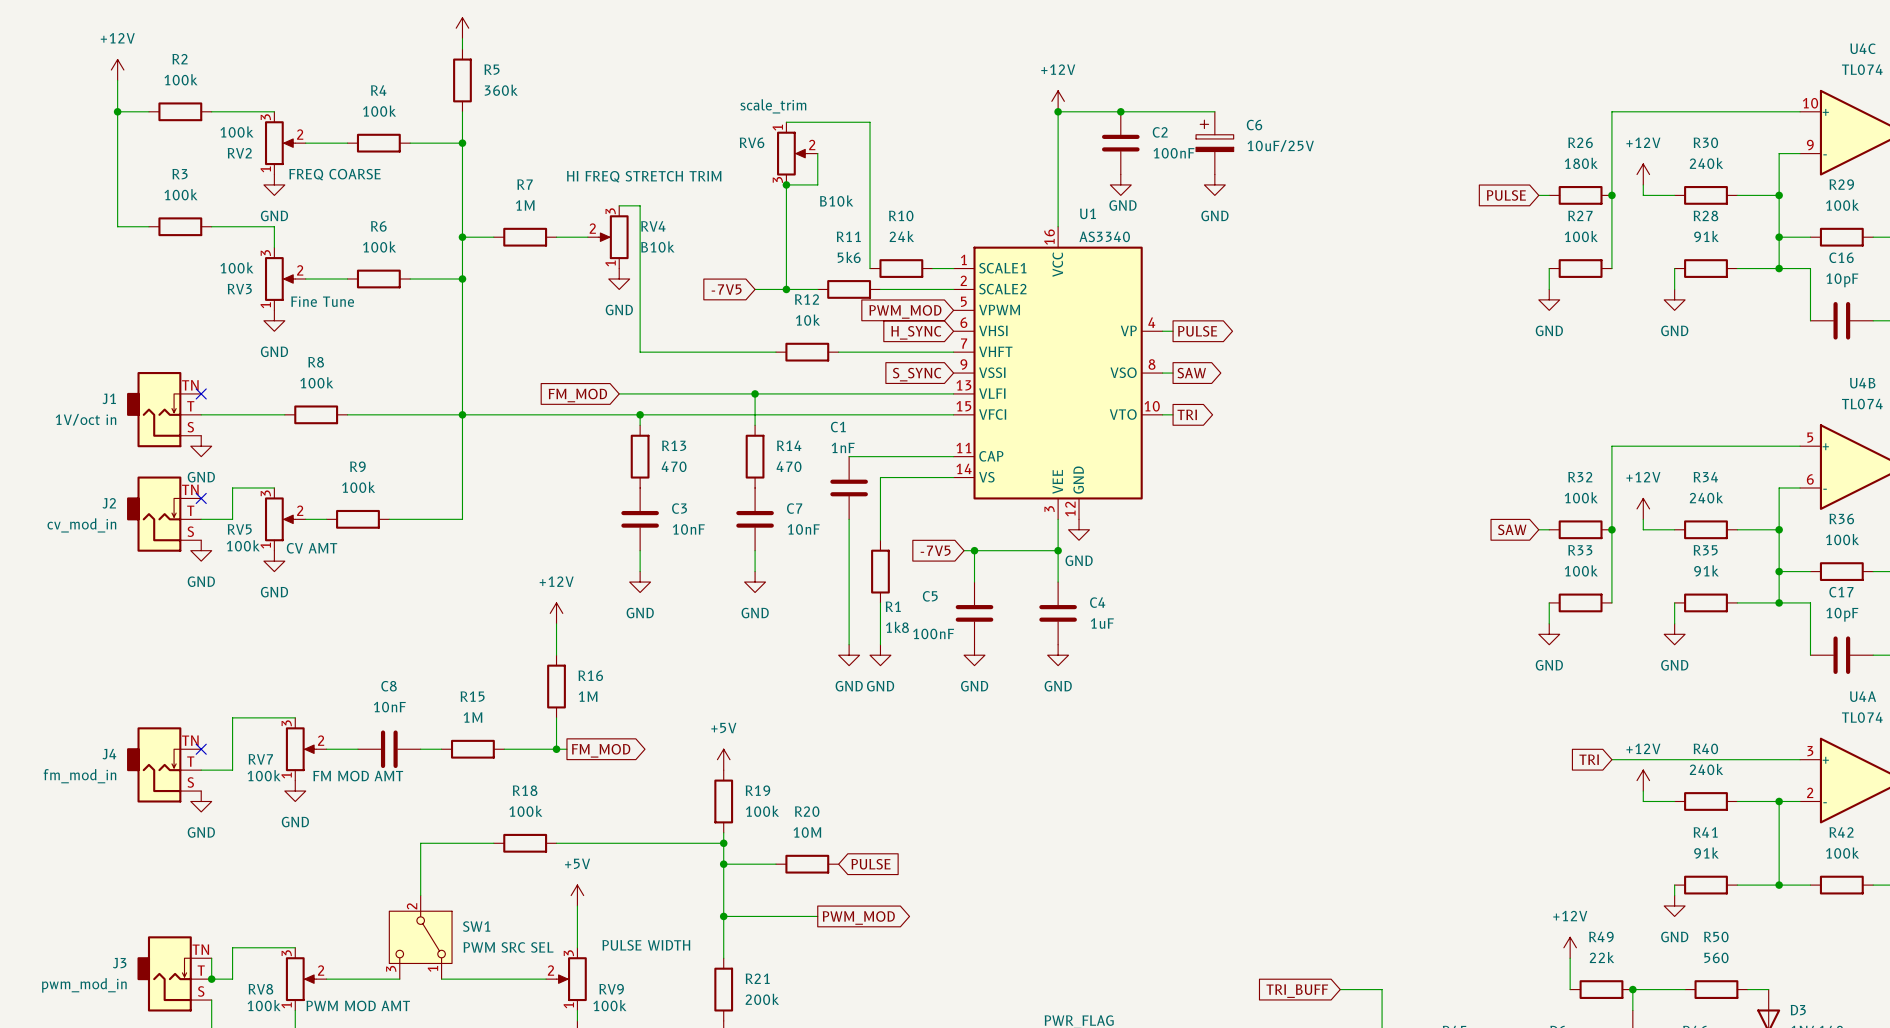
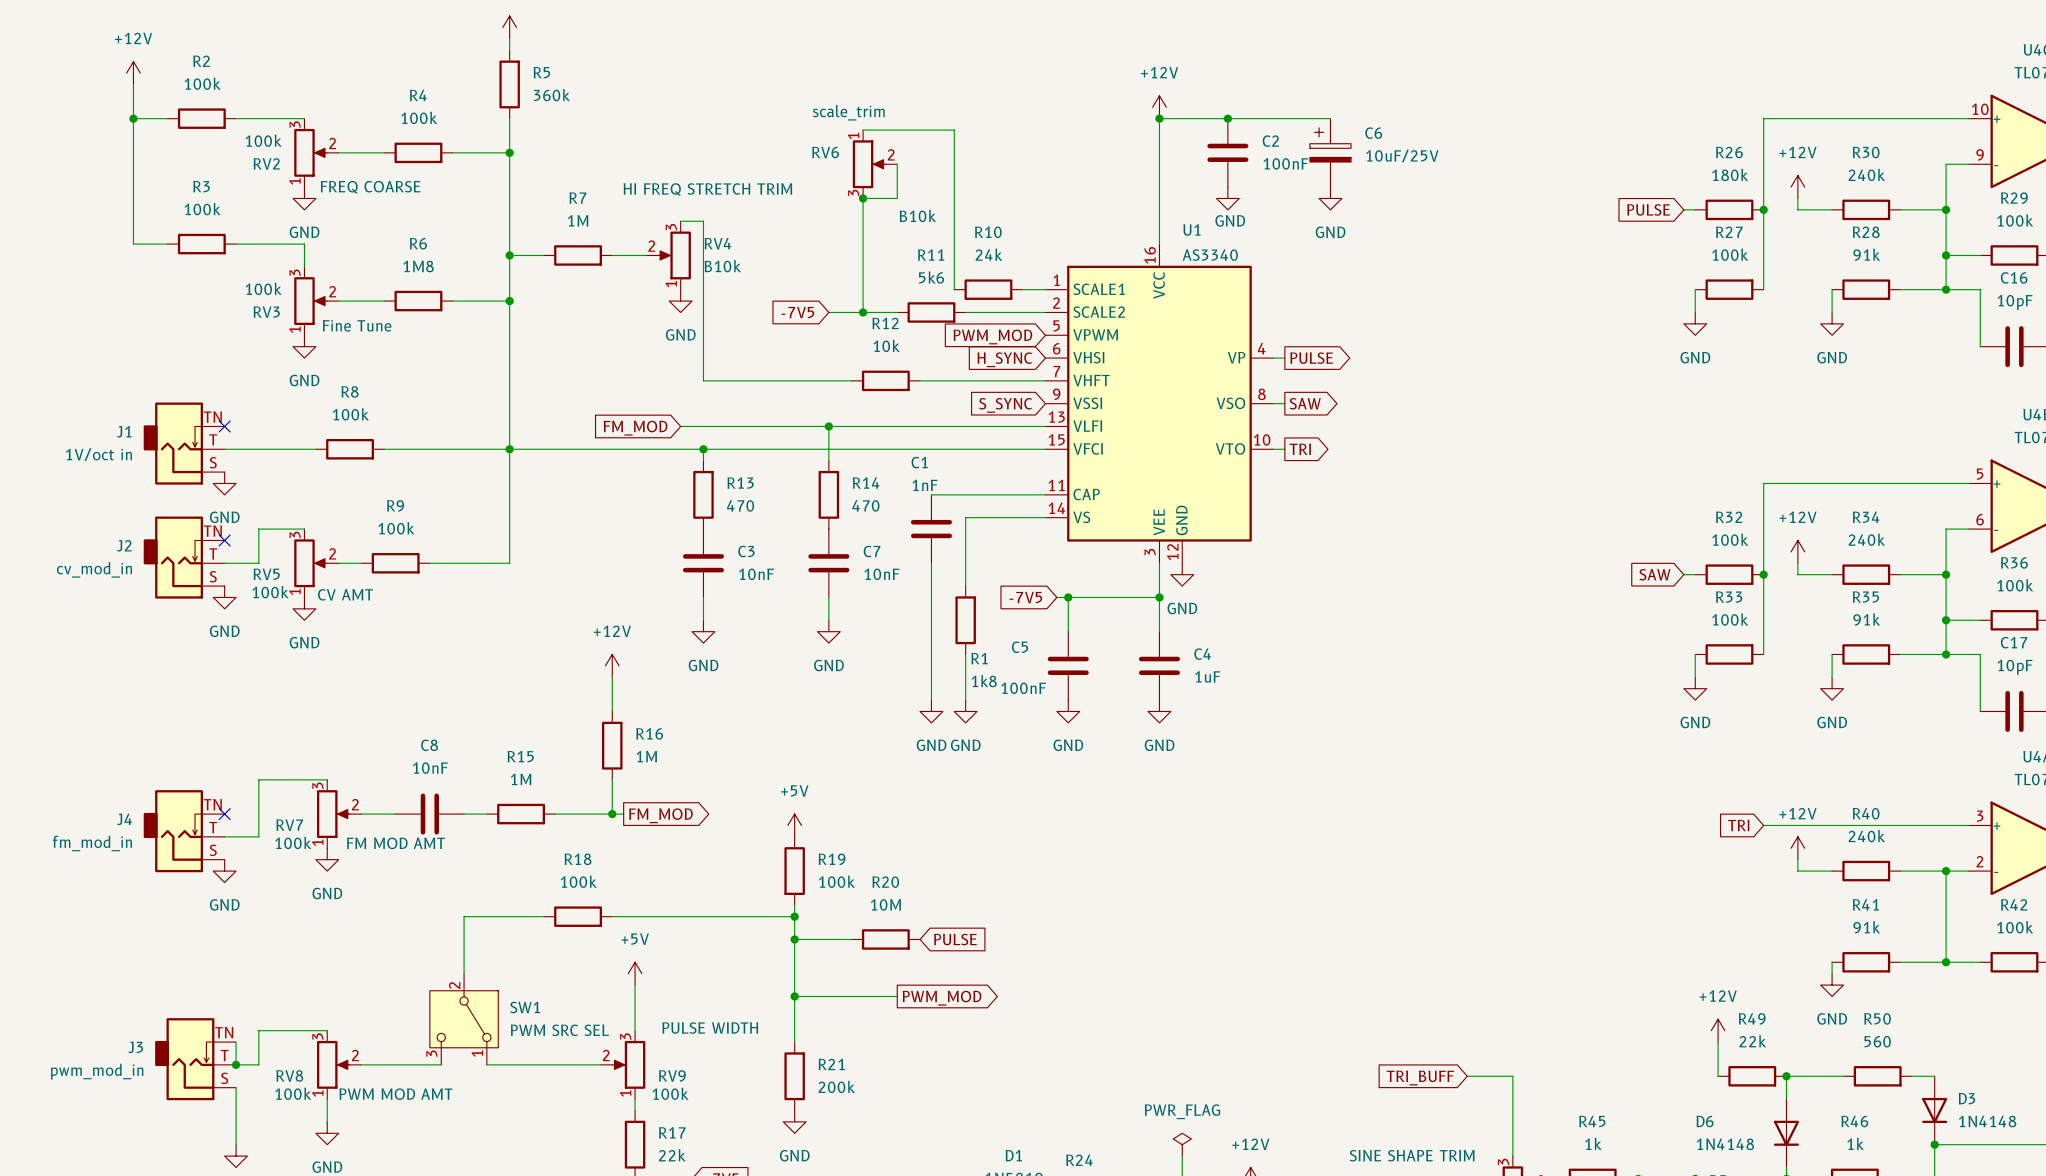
R6 value: 100k (379, 246) -> 1M8 (418, 266)

